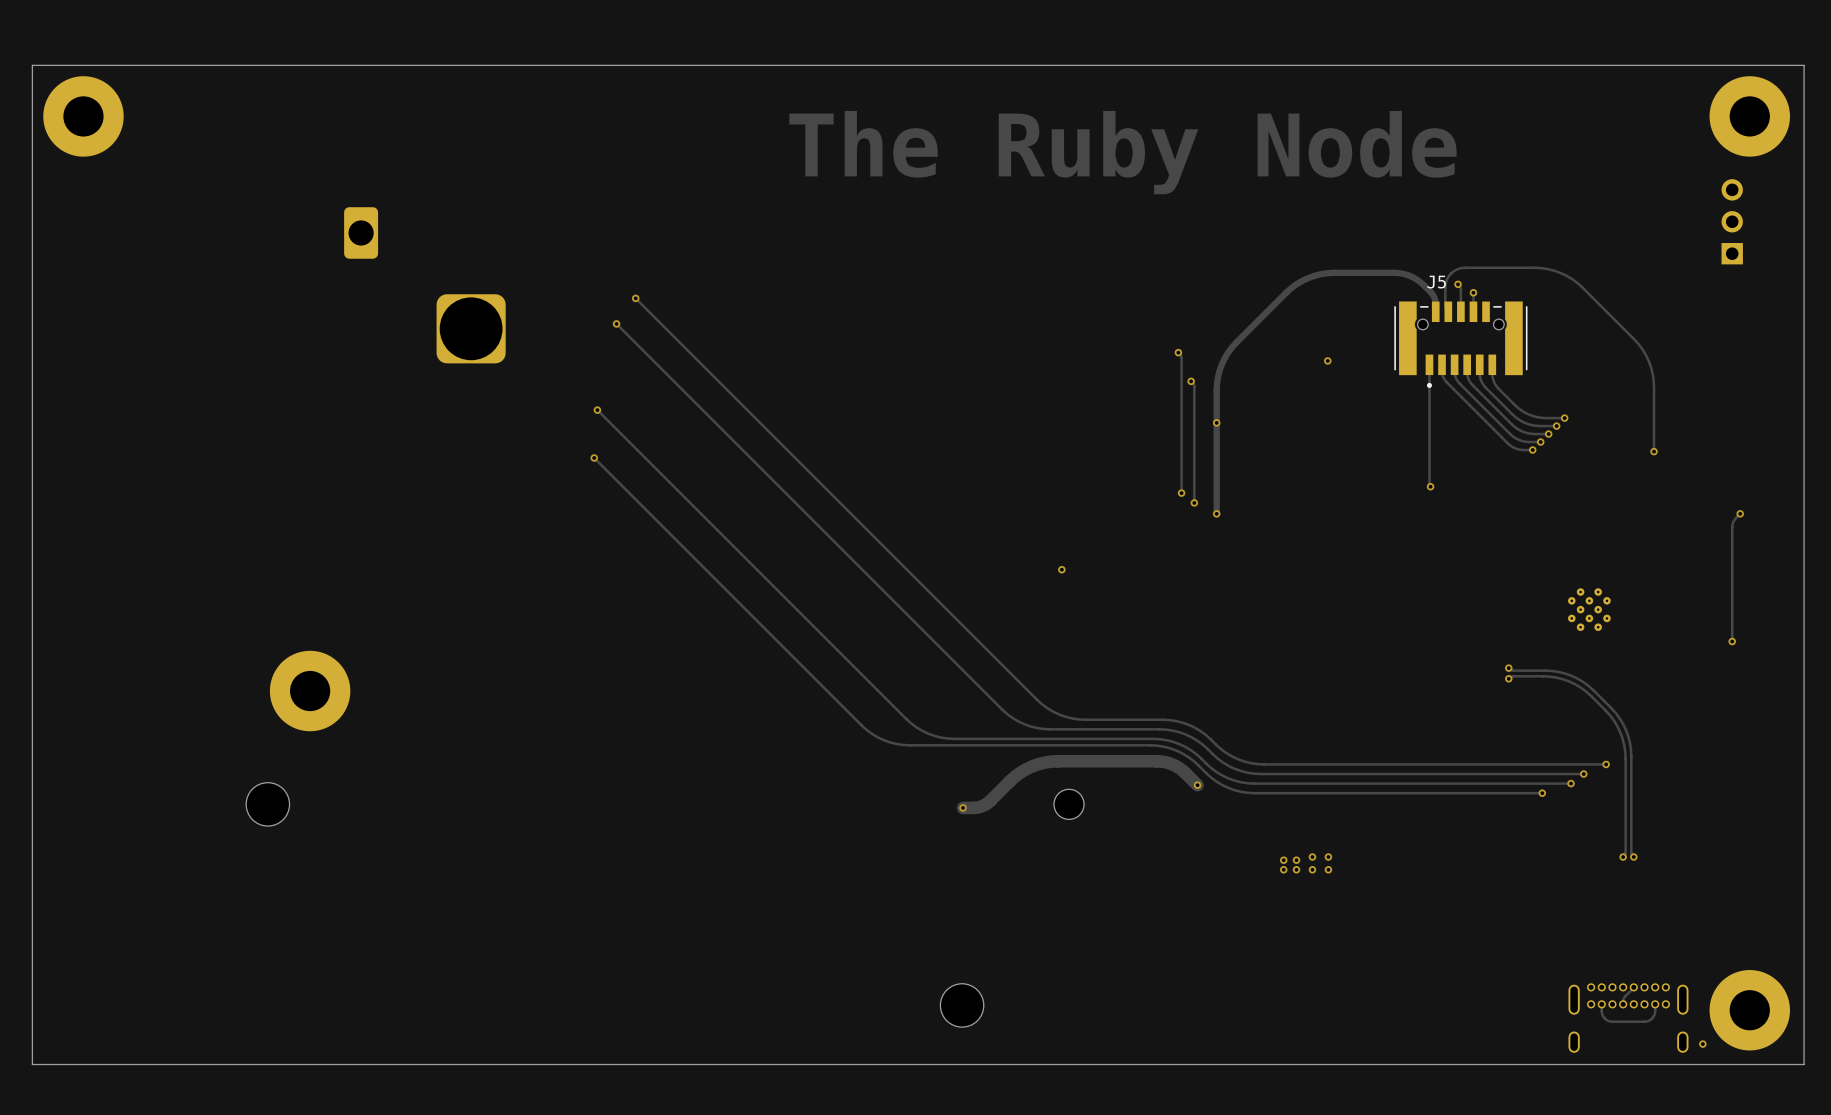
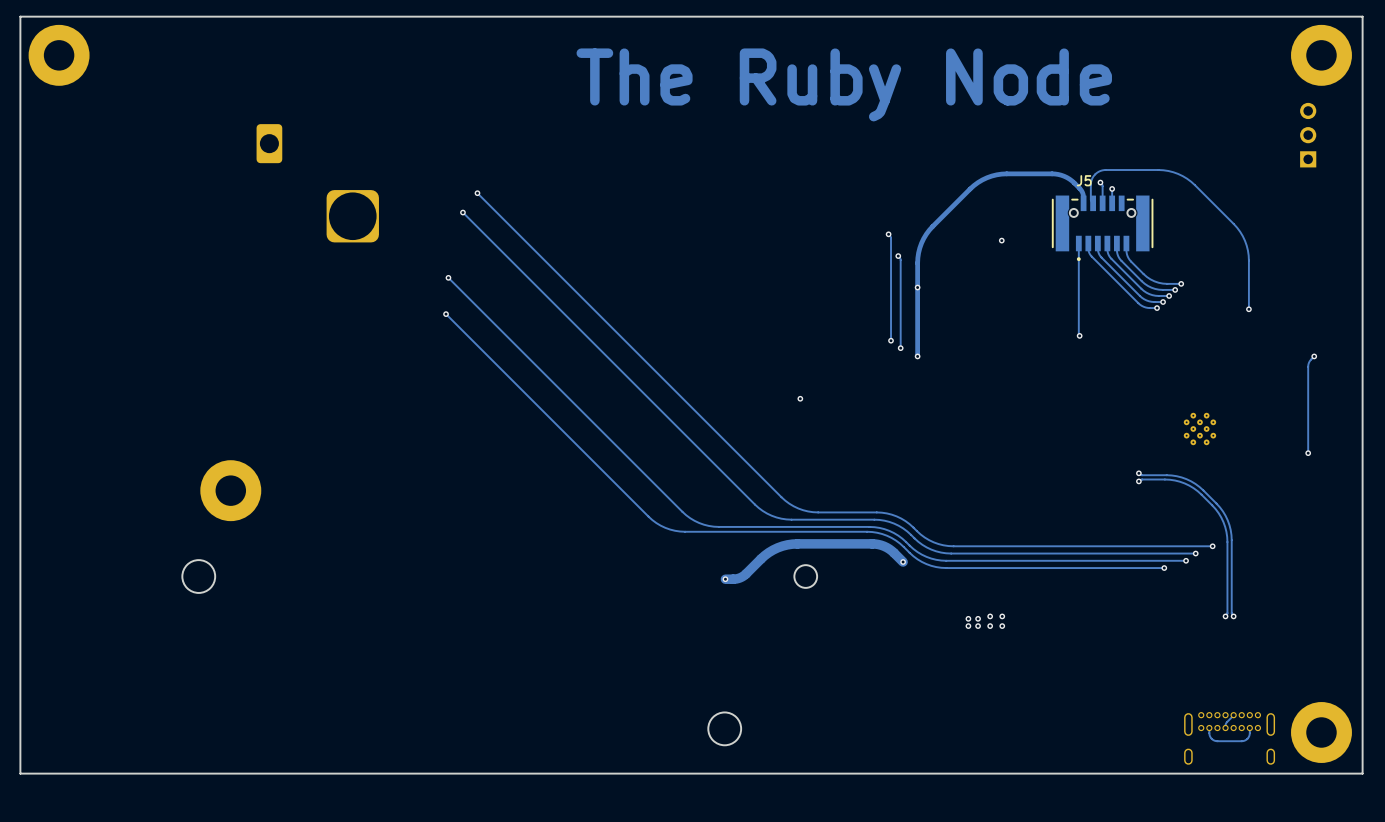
via: (1702, 1044) -> none

